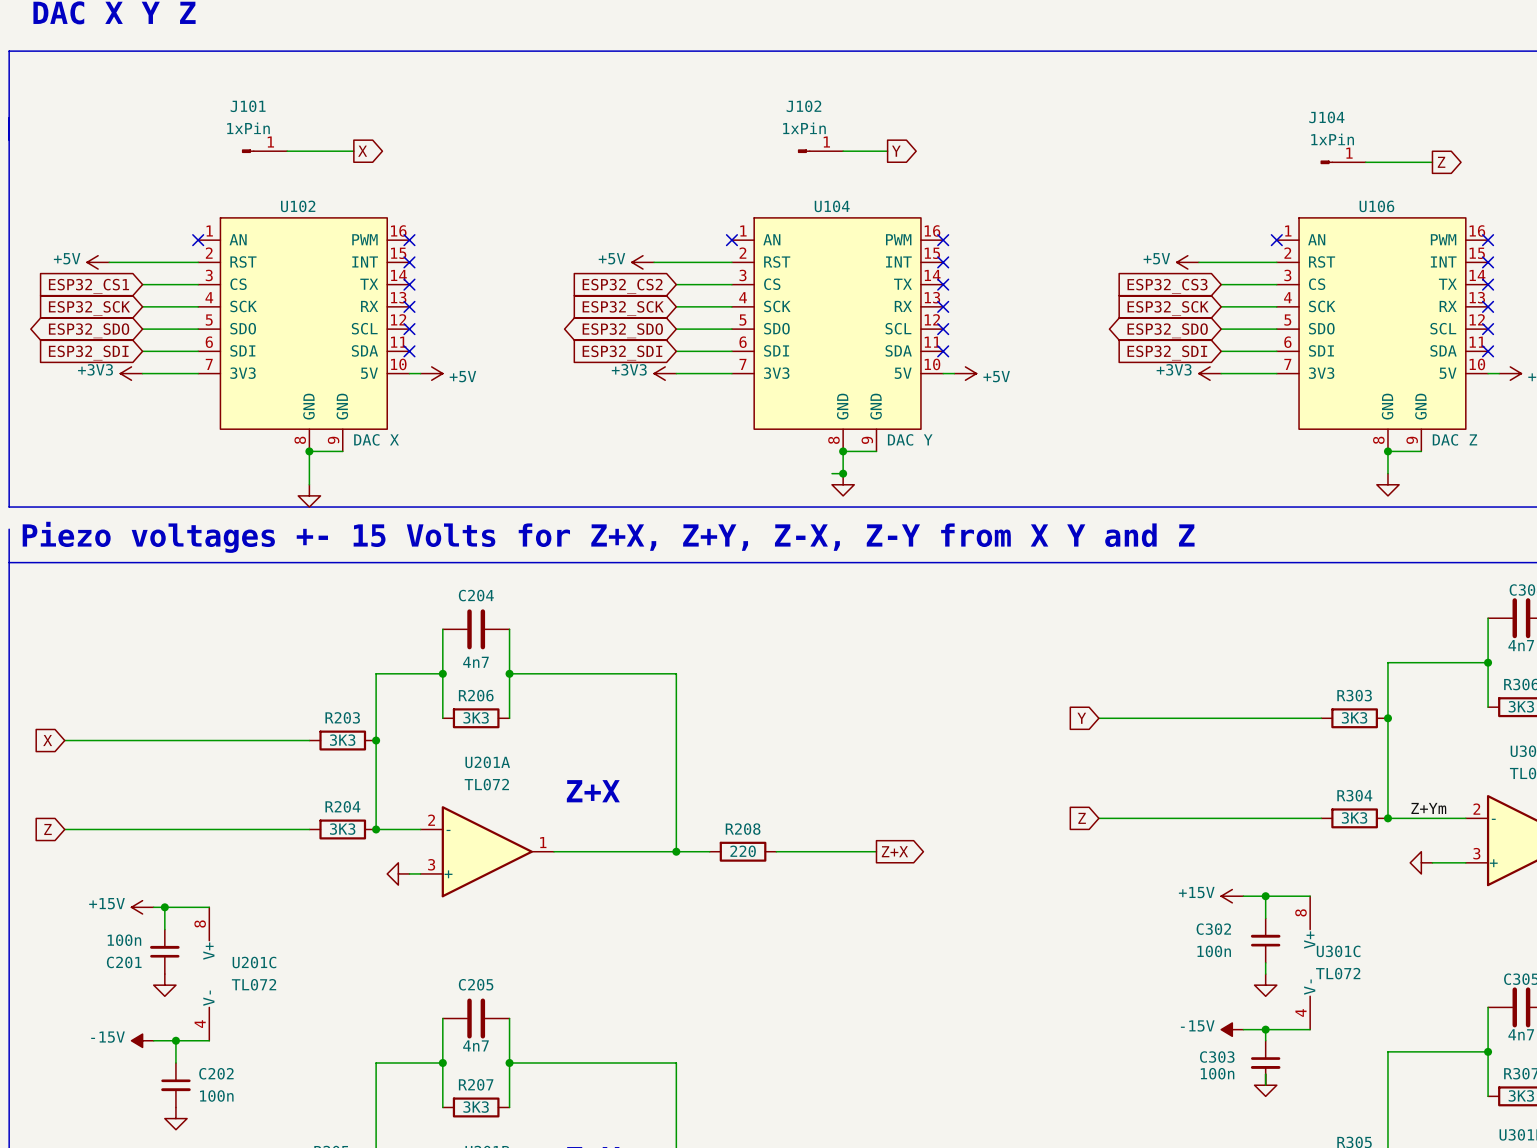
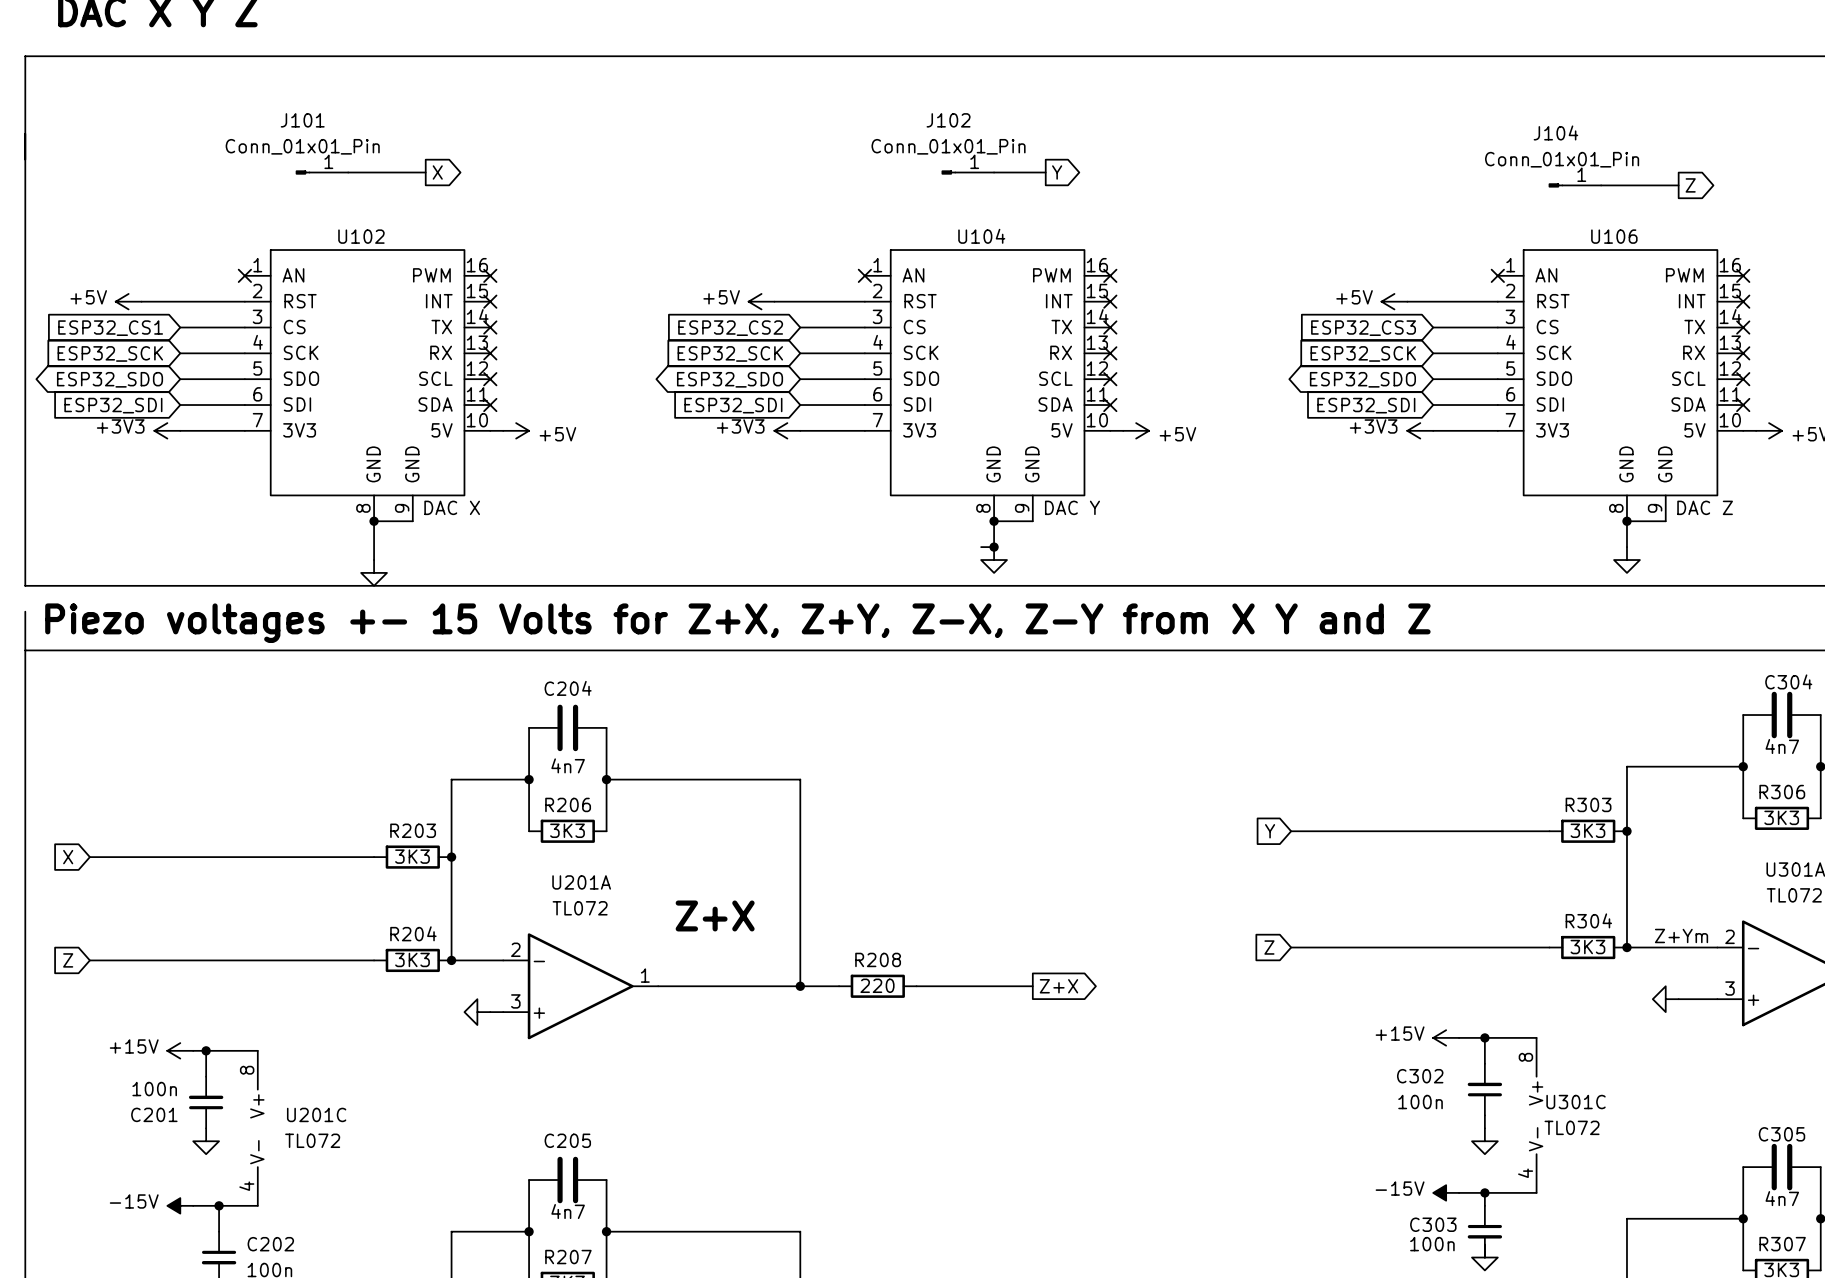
J101 value: 1xPin (248, 128) -> Conn_01x01_Pin (302, 146)
J102 value: 1xPin (804, 128) -> Conn_01x01_Pin (948, 146)
J104 value: 1xPin (1332, 139) -> Conn_01x01_Pin (1562, 159)

